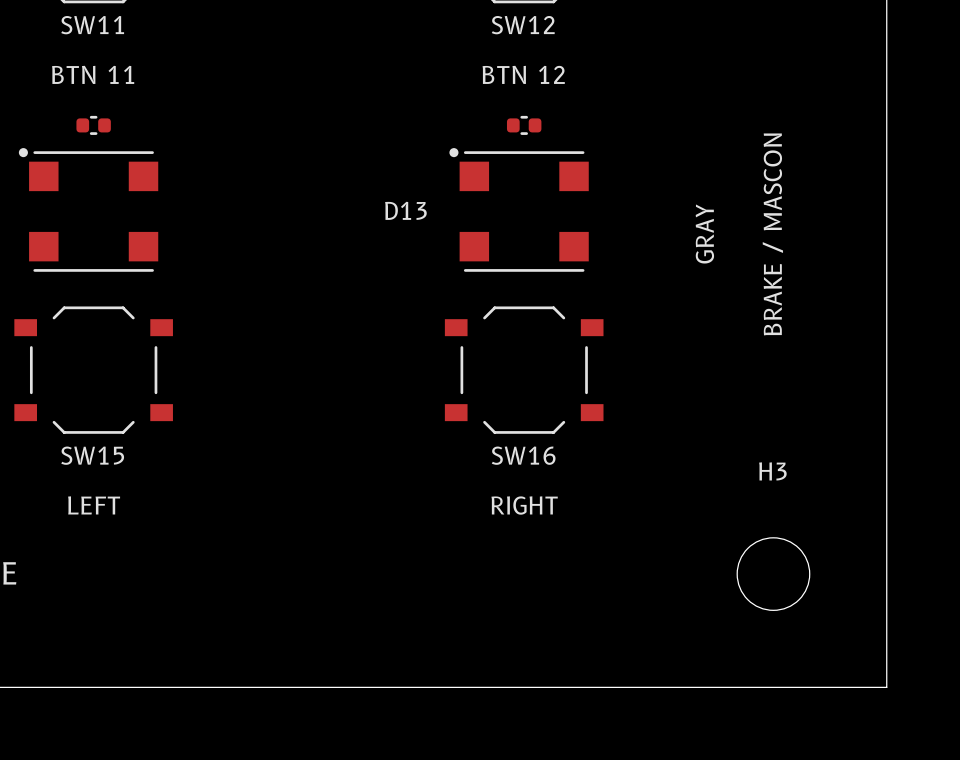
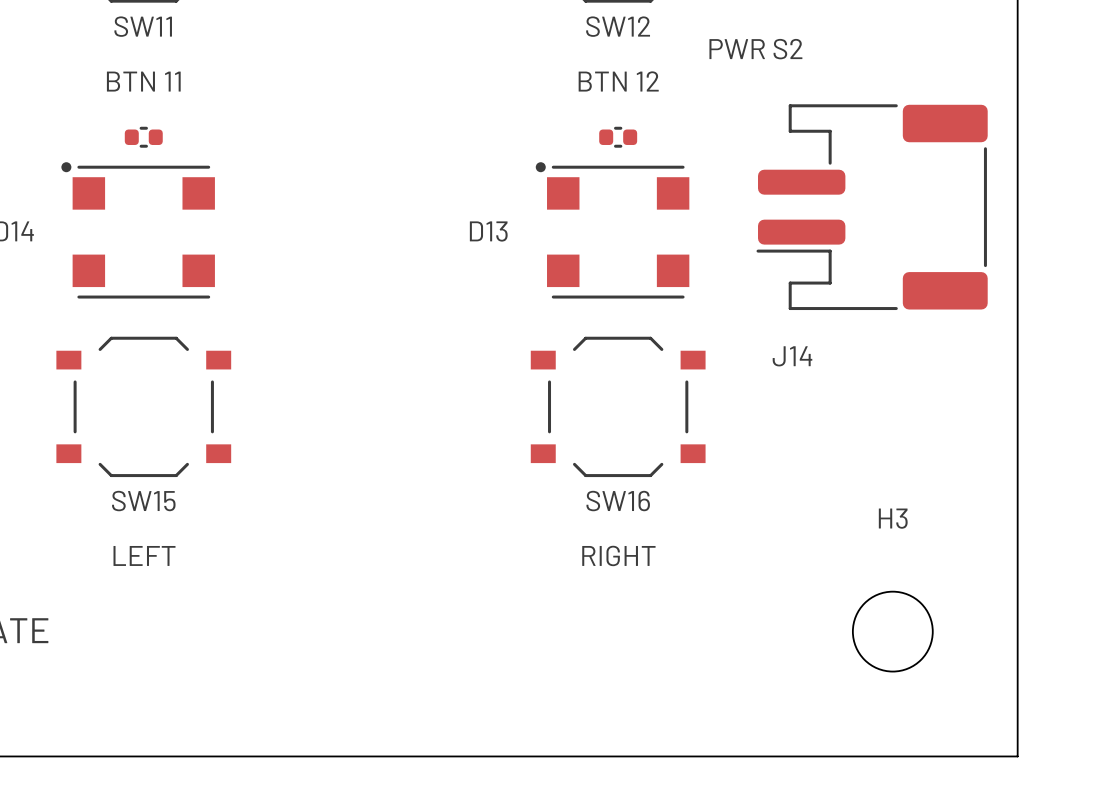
text: none -> PWR S2 (755, 49)
J14: none -> (872, 207)
text: GRAY (704, 234) -> none
text: BRAKE / MASCON (772, 234) -> none

